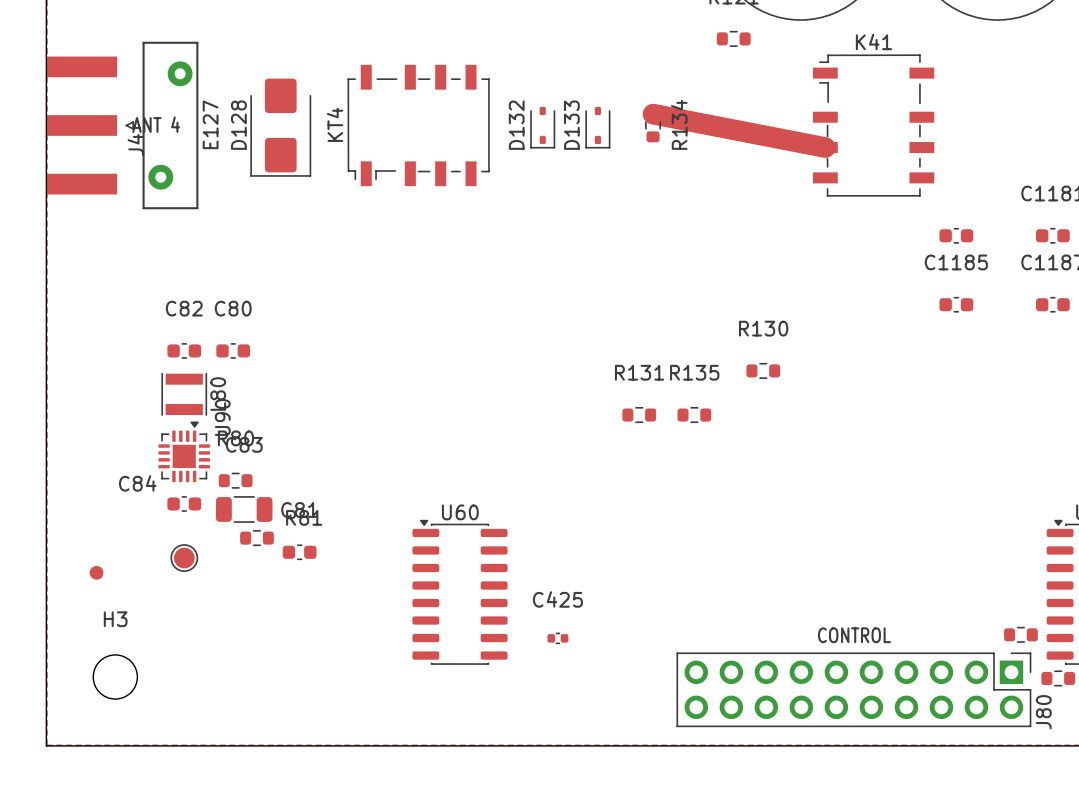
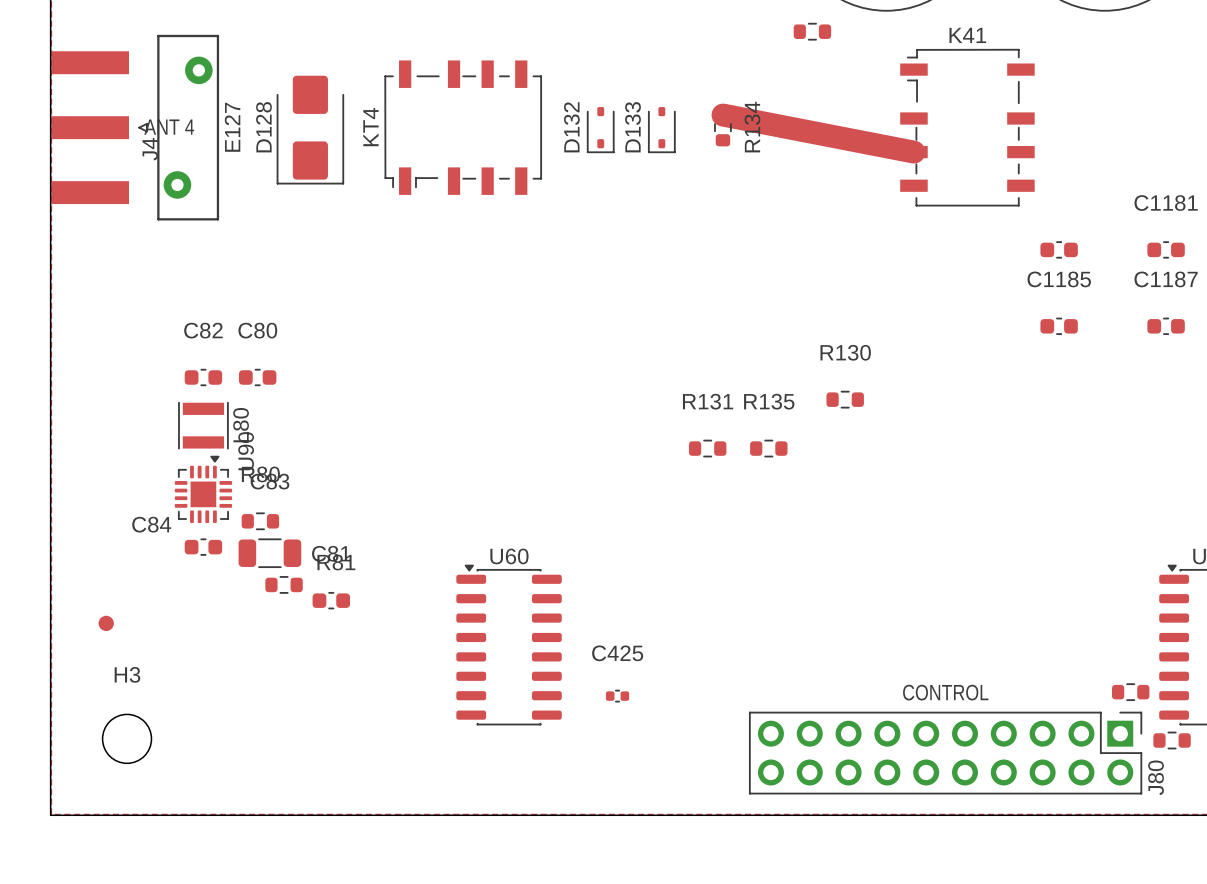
part: (184, 558) -> none

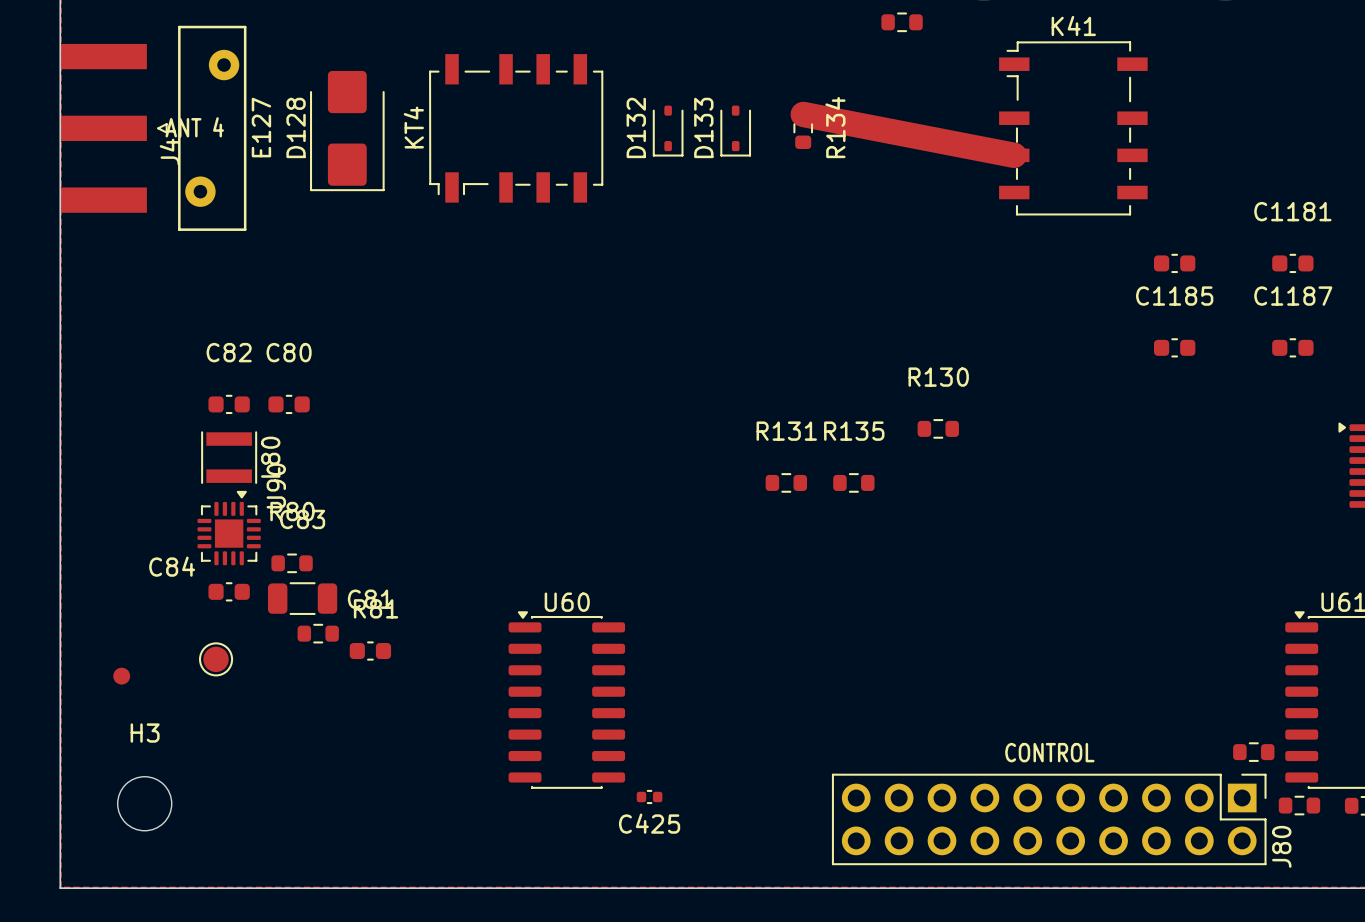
part: none -> (216, 659)
C425 name position: C425 (617, 653) -> C425 (649, 823)
C425 position: (617, 696) -> (649, 796)

